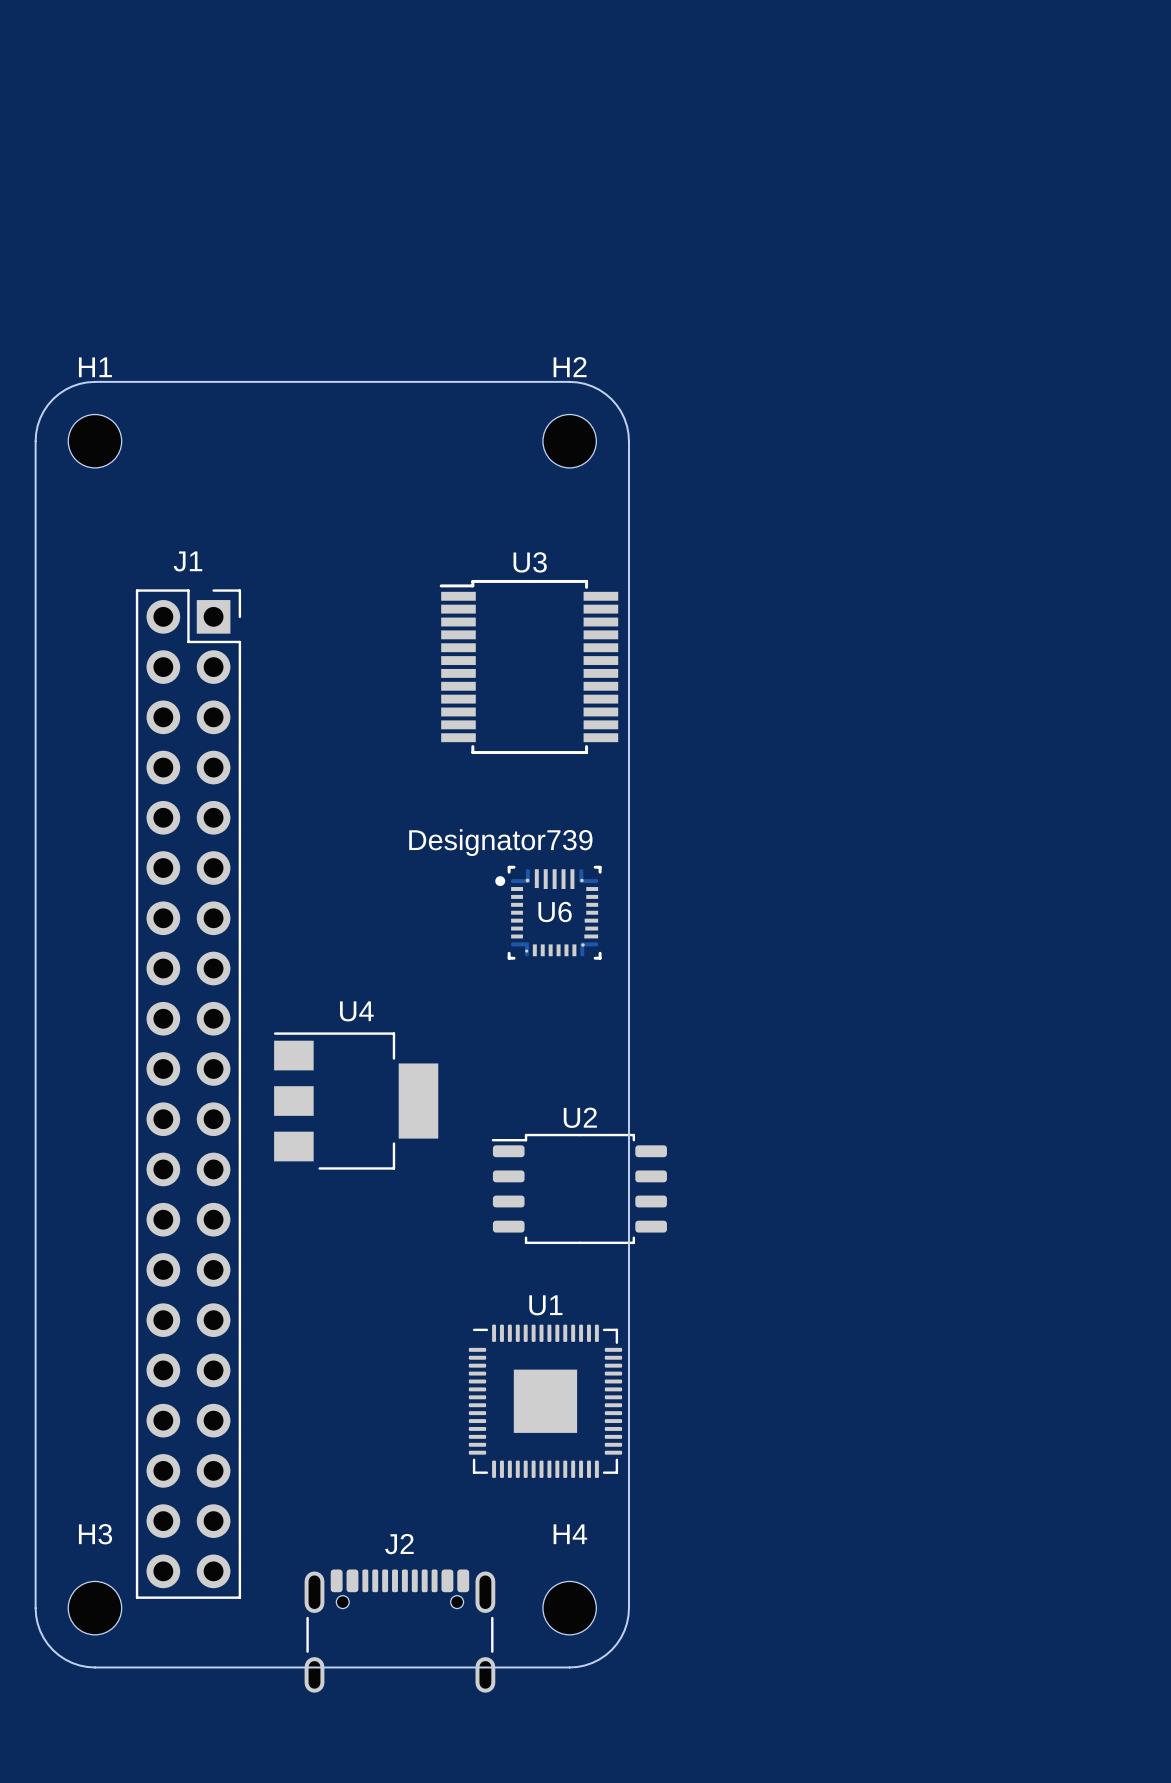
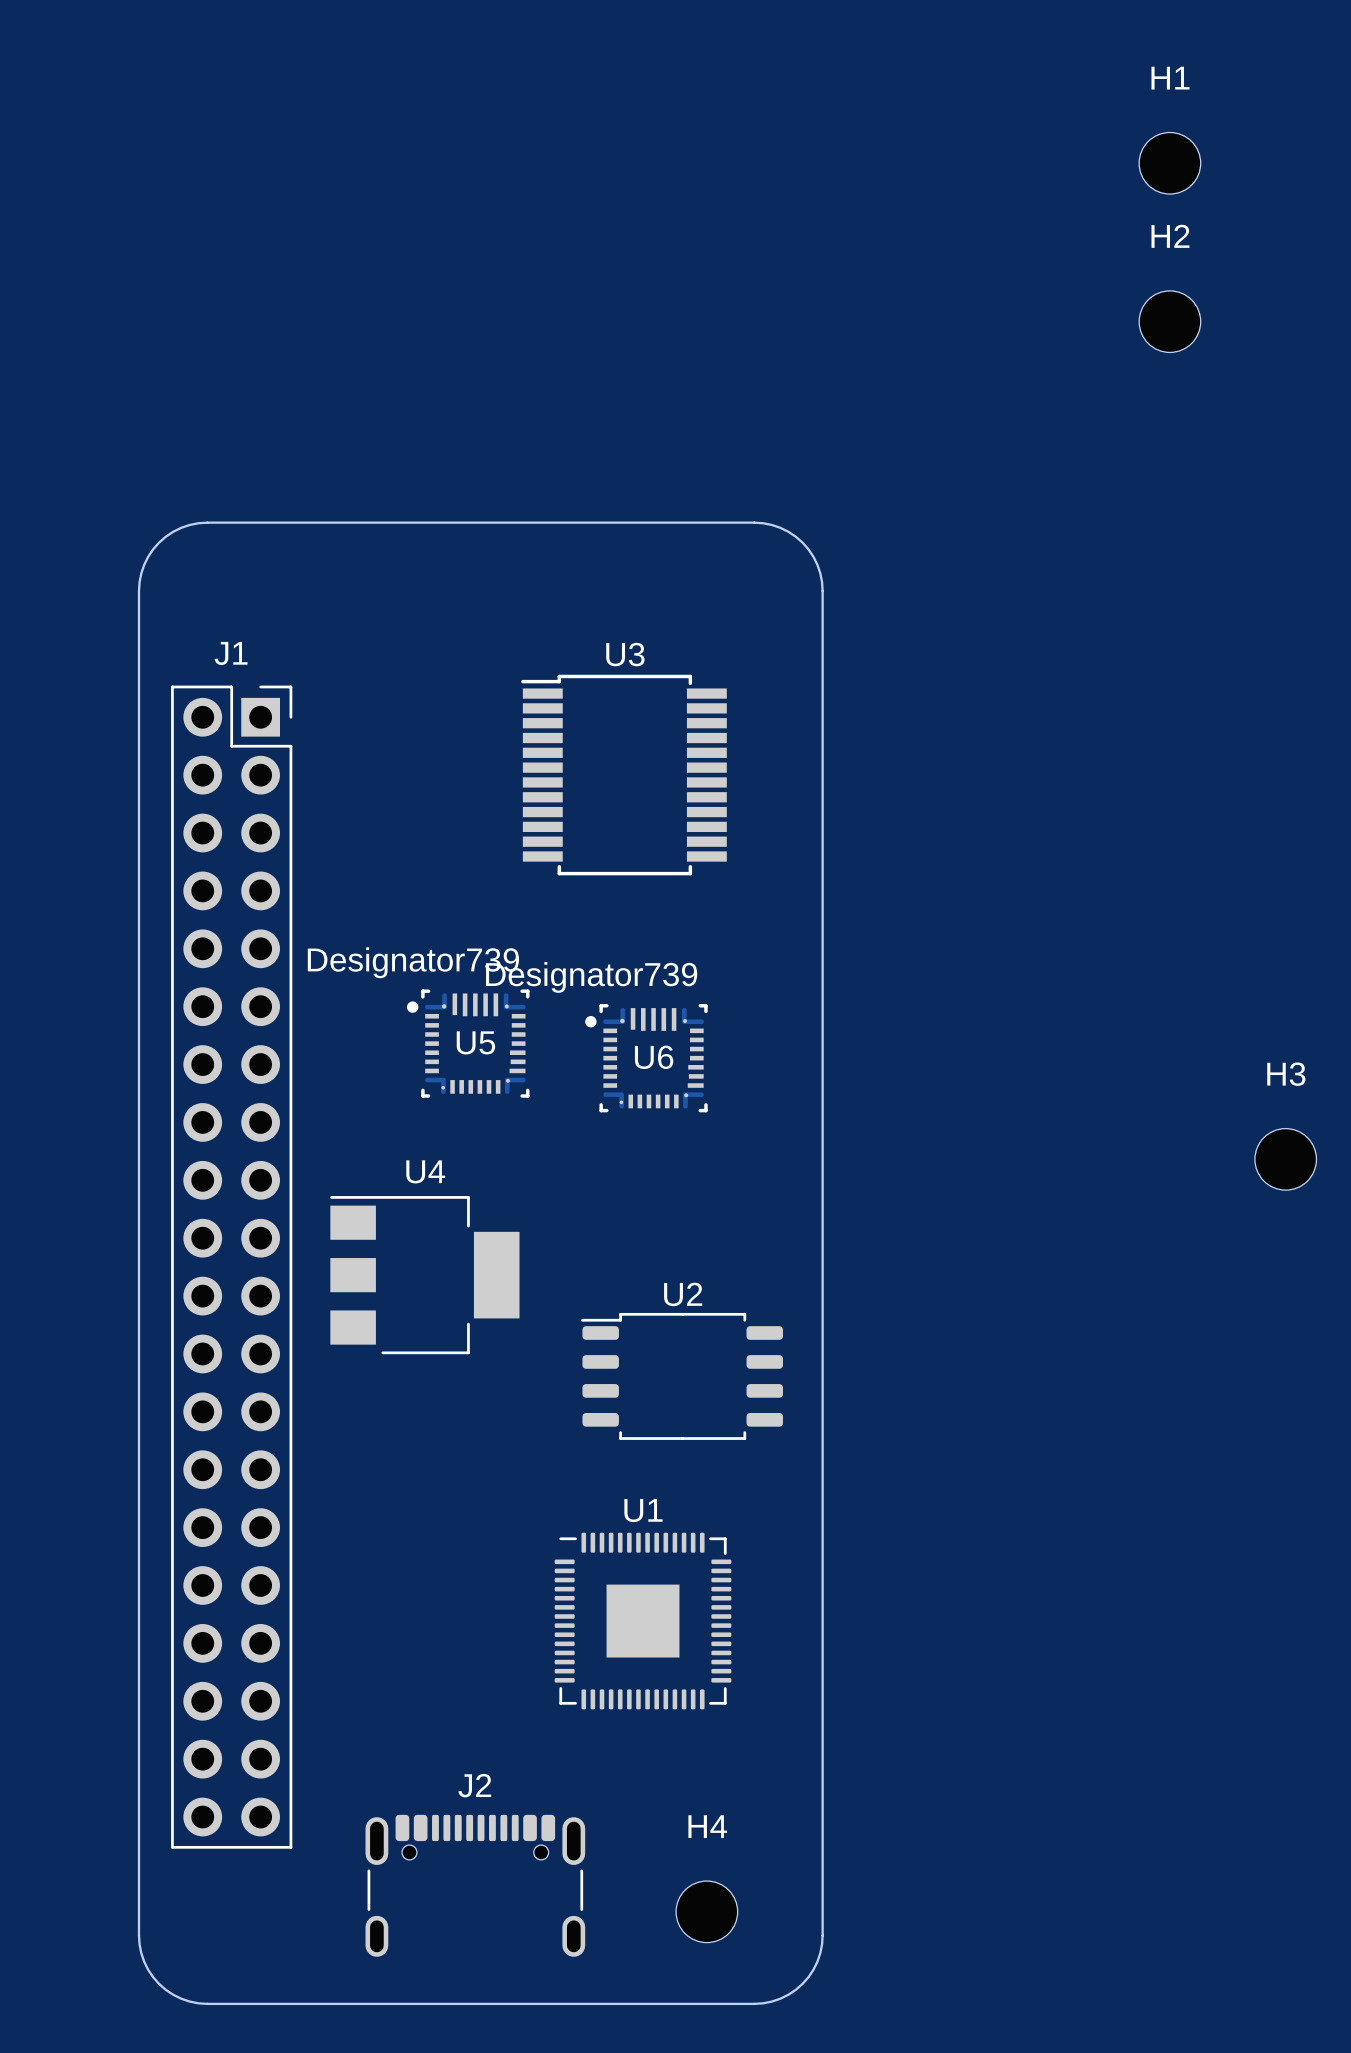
board edge: (94, 381) (577, 382) (592, 386) (605, 394) (616, 405) (624, 418) (628, 441) (628, 1608) (624, 1630) (616, 1644) (605, 1655) (592, 1662) (569, 1667) (94, 1667) (72, 1662) (58, 1655) (47, 1644) (40, 1630) (35, 1608) (35, 441) (40, 418) (53, 399) (72, 386) (94, 381) -> (207, 522) (763, 523) (780, 527) (795, 536) (808, 549) (817, 564) (822, 591) (822, 1935) (820, 1953) (813, 1969) (795, 1989) (780, 1998) (754, 2003) (207, 2003) (181, 1998) (165, 1989) (153, 1977) (144, 1961) (138, 1935) (138, 591) (144, 564) (159, 542) (181, 527) (207, 522)
H1 position: (94, 441) -> (1169, 163)
H2 position: (569, 441) -> (1169, 321)
U5: none -> (468, 1043)
H3 position: (94, 1608) -> (1285, 1159)
H4 position: (569, 1608) -> (706, 1911)

